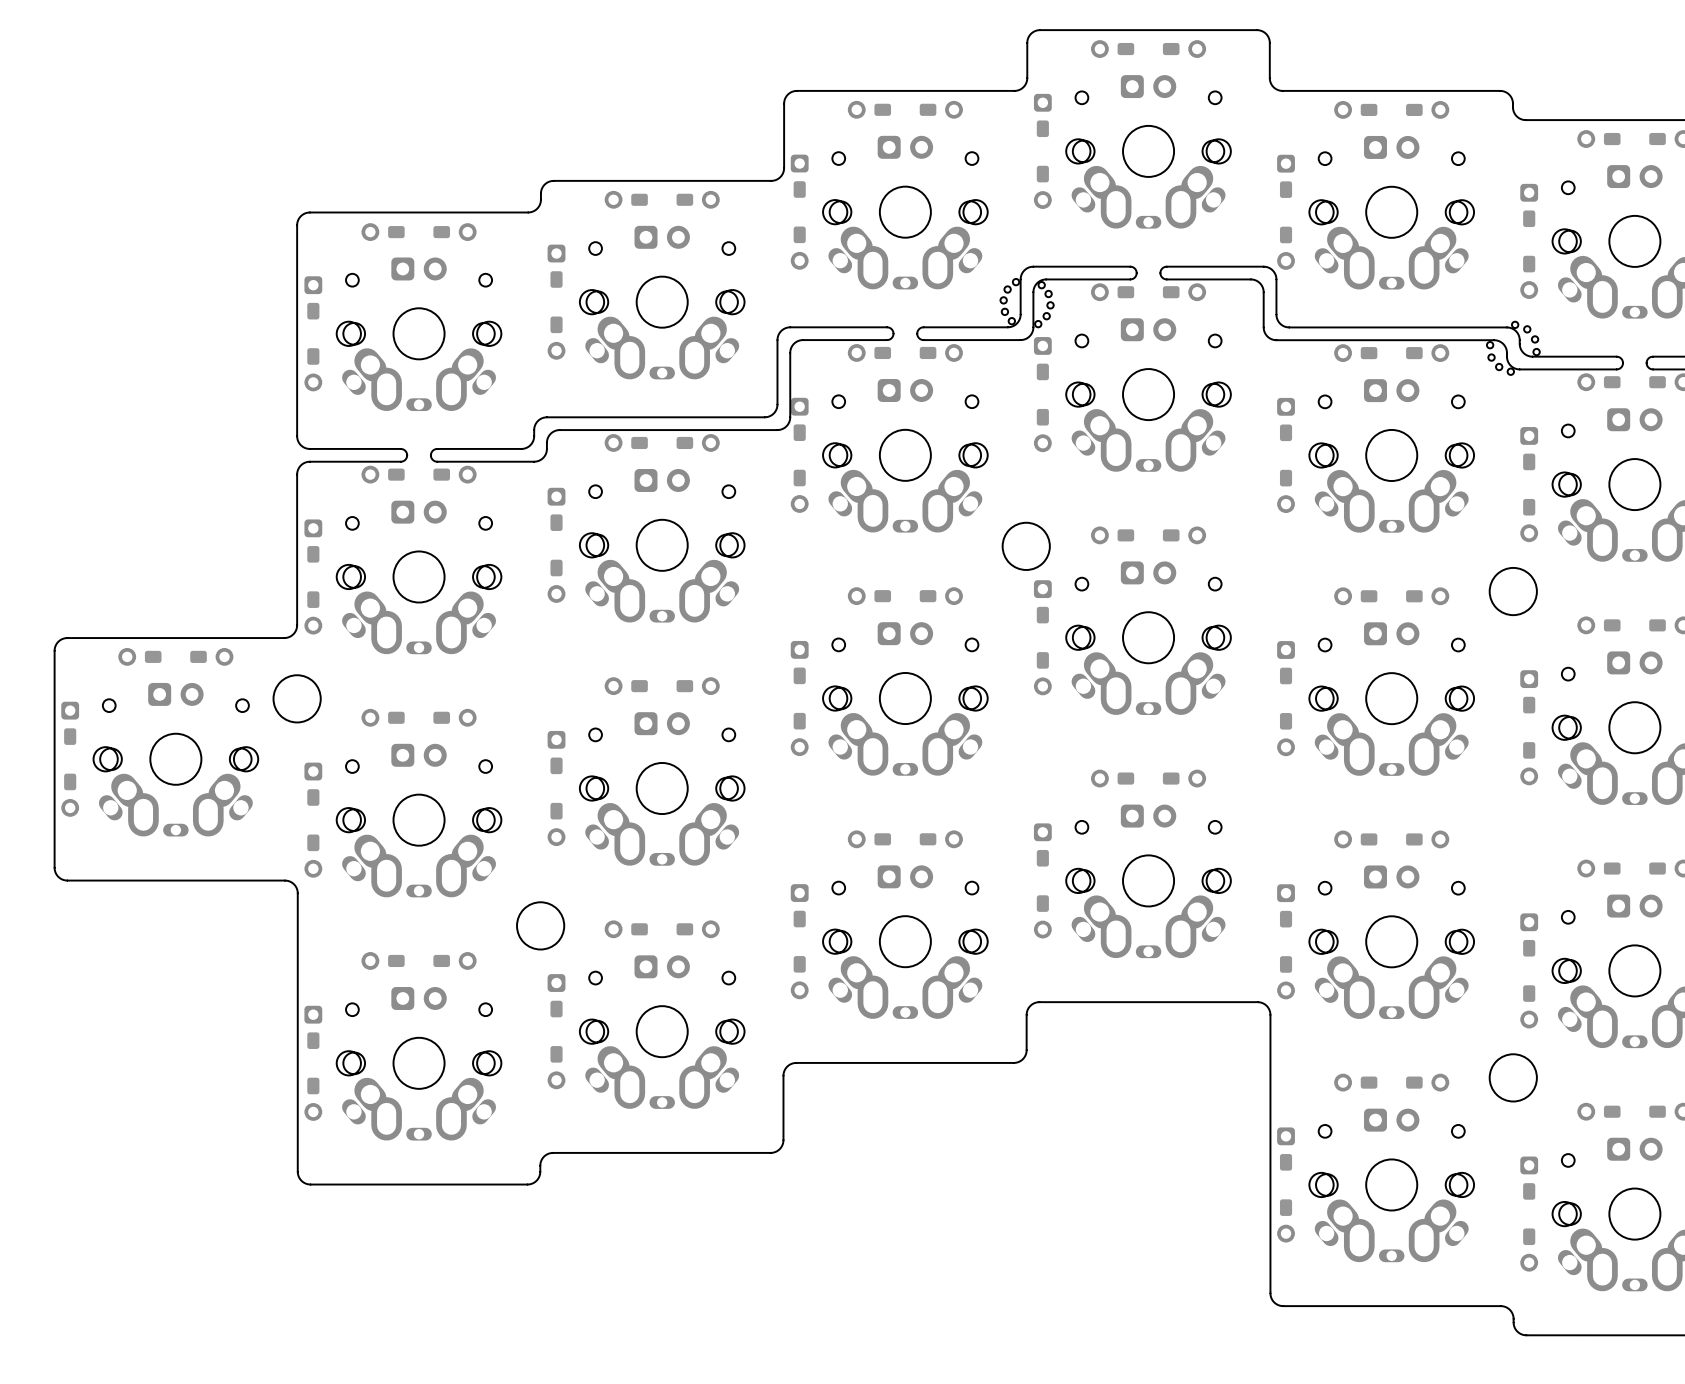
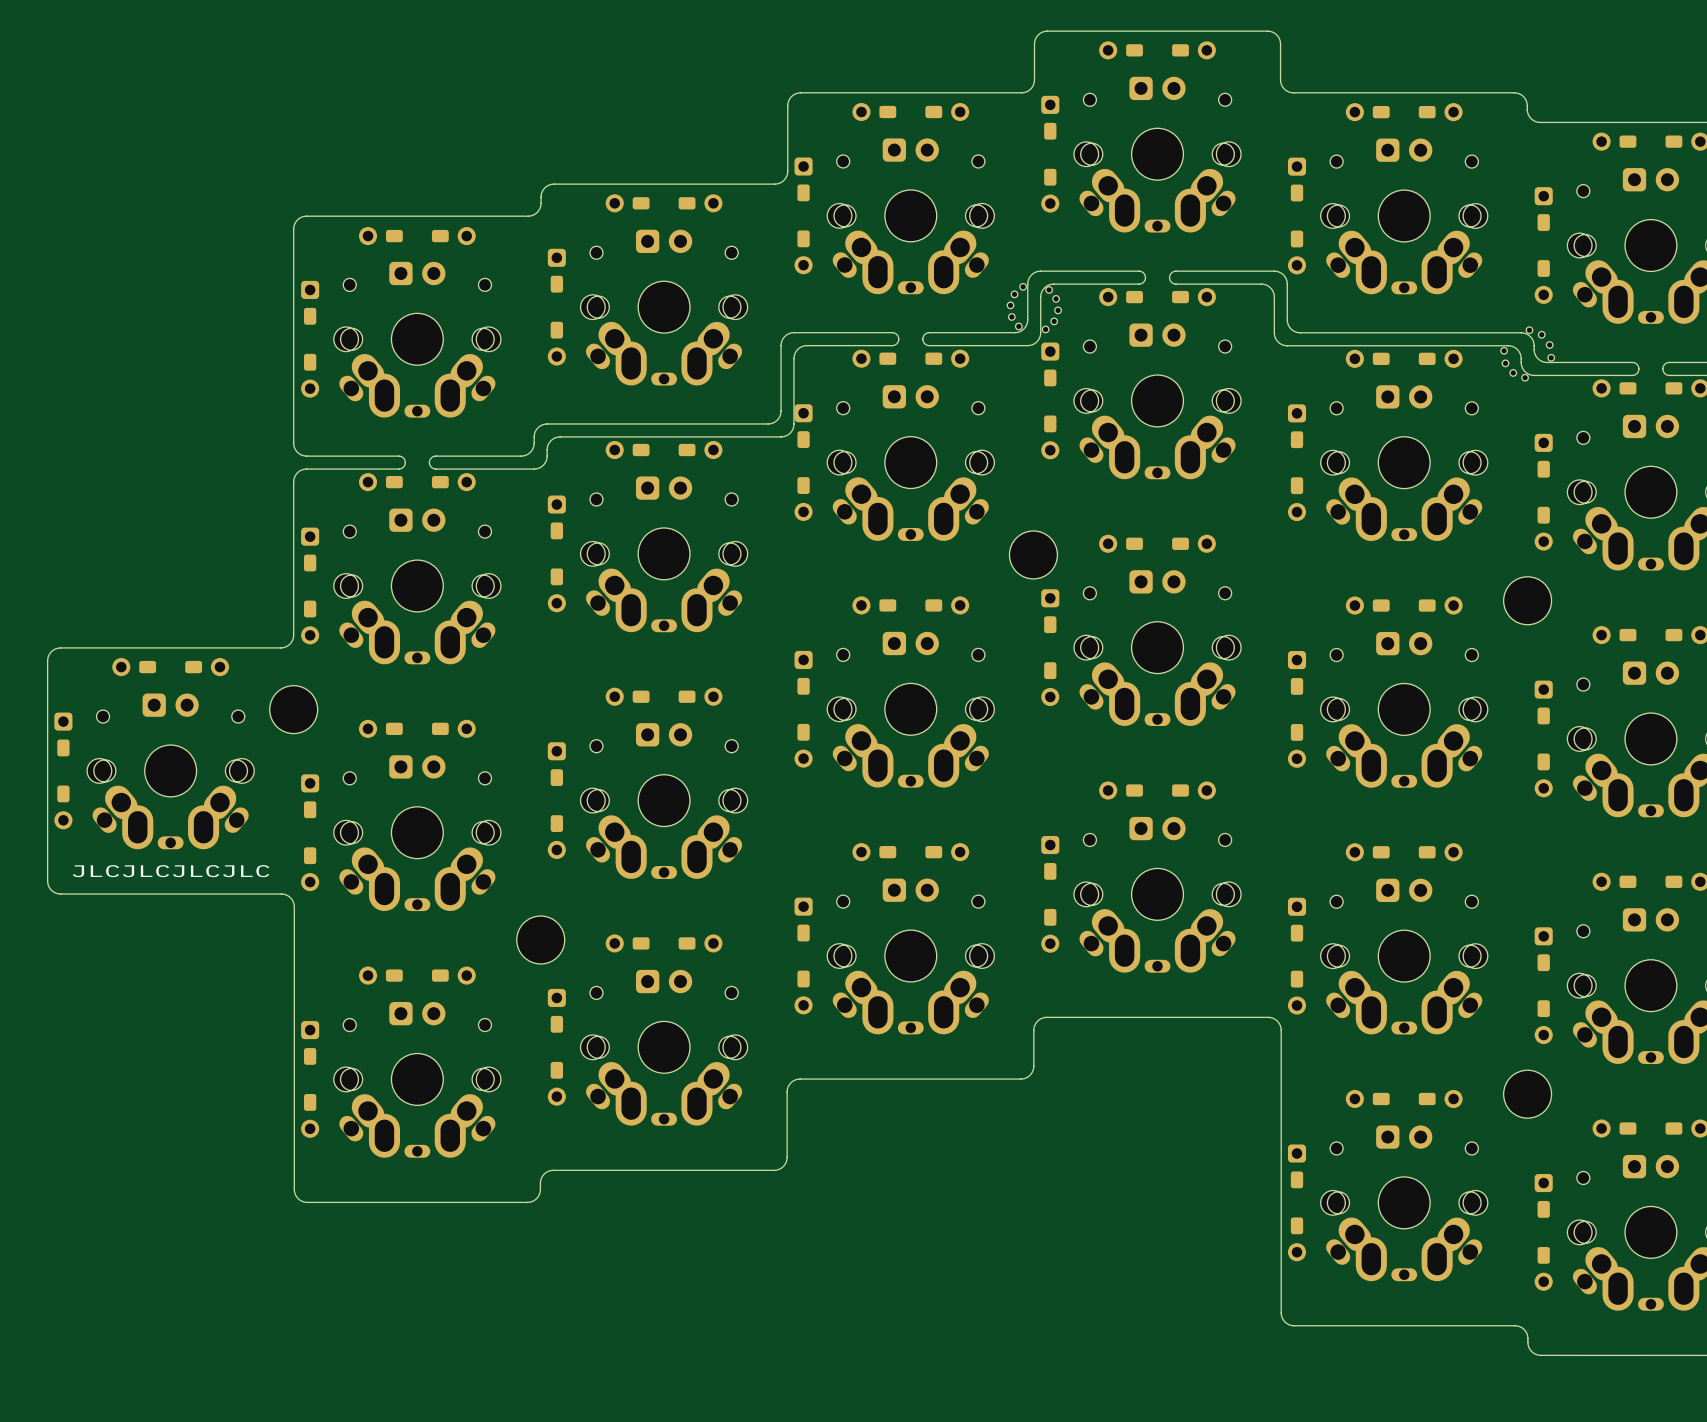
text: none -> JLCJLCJLCJLC (171, 871)

